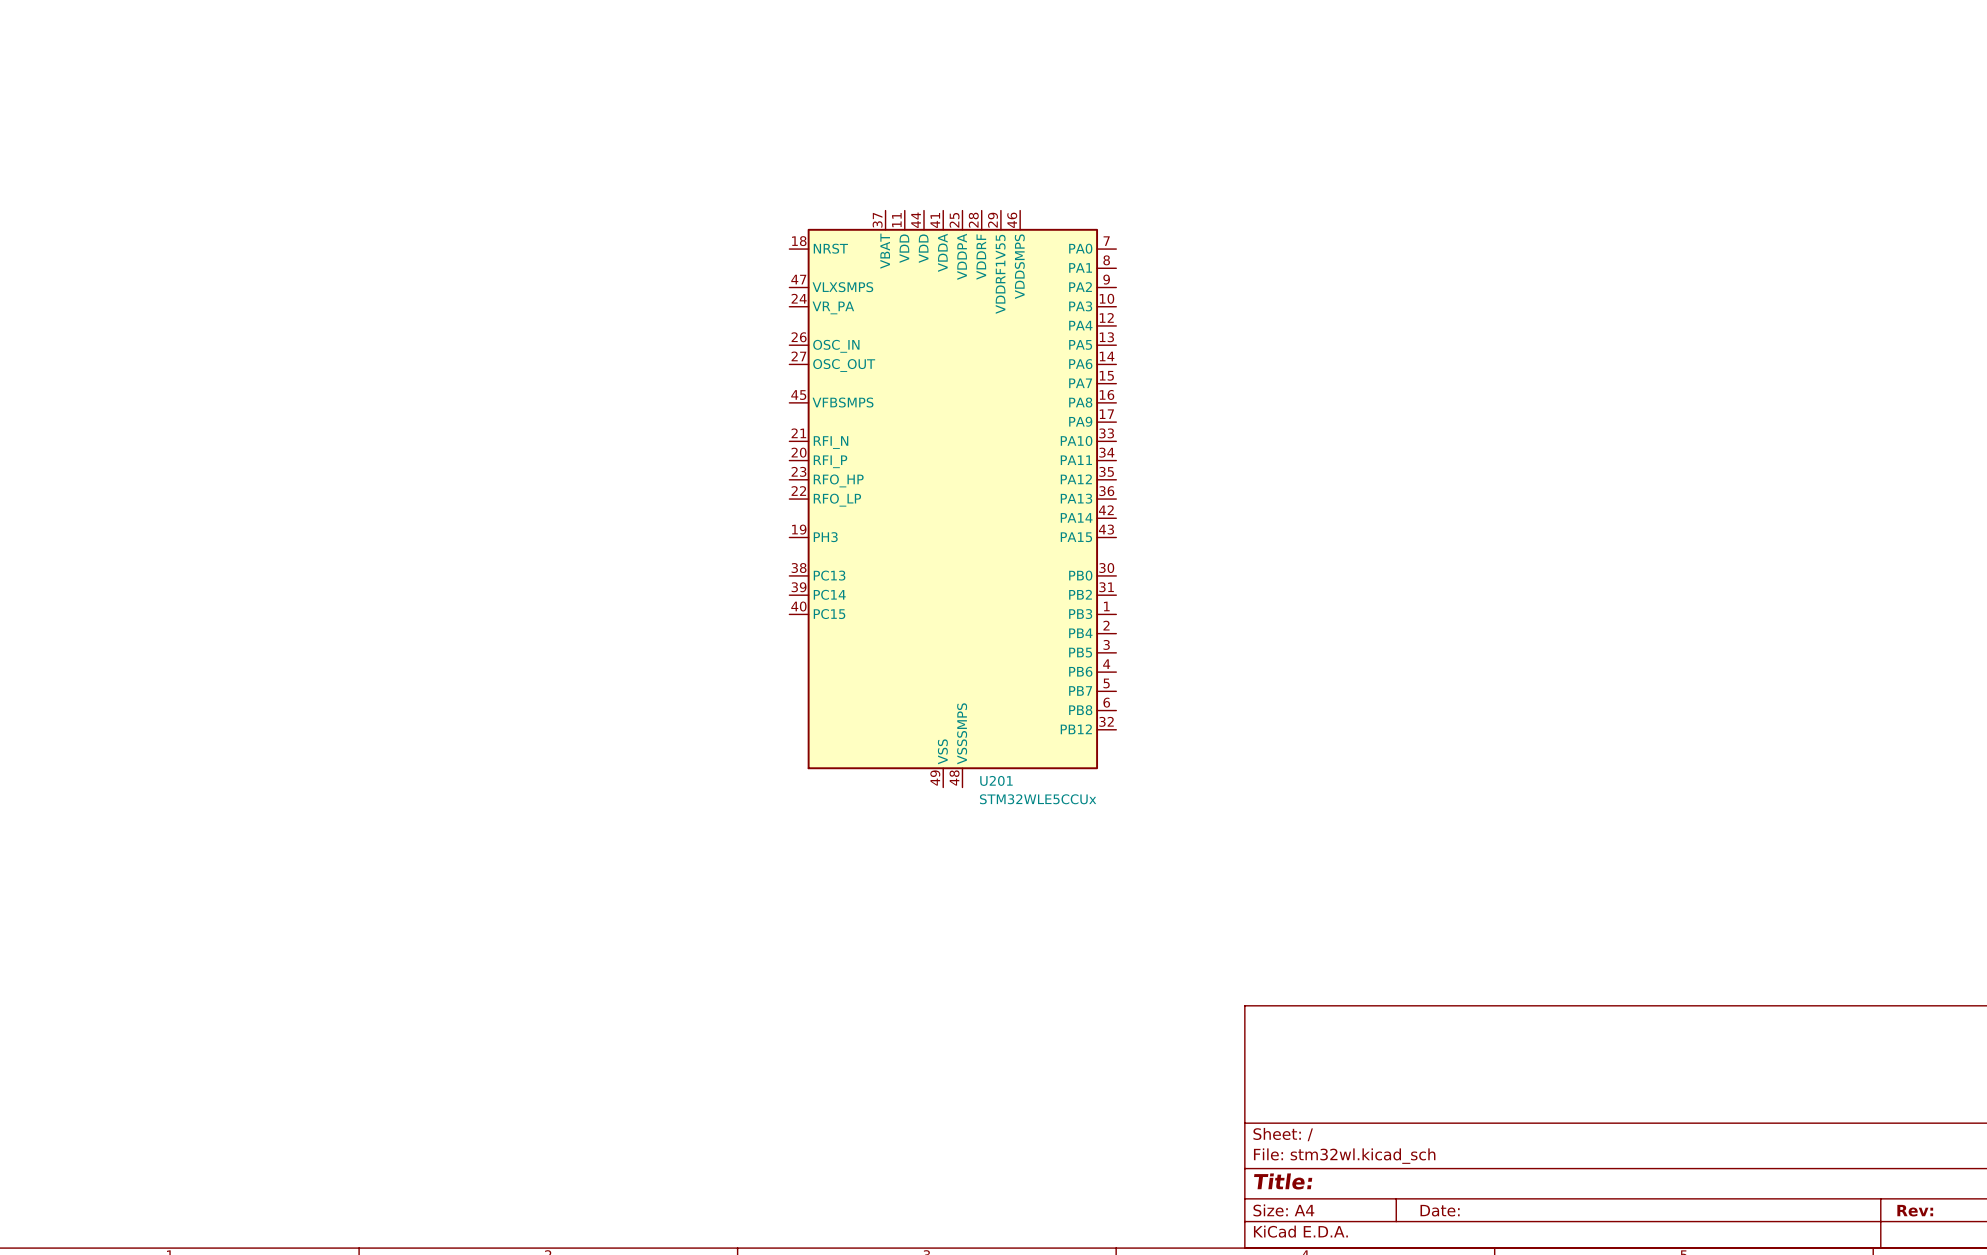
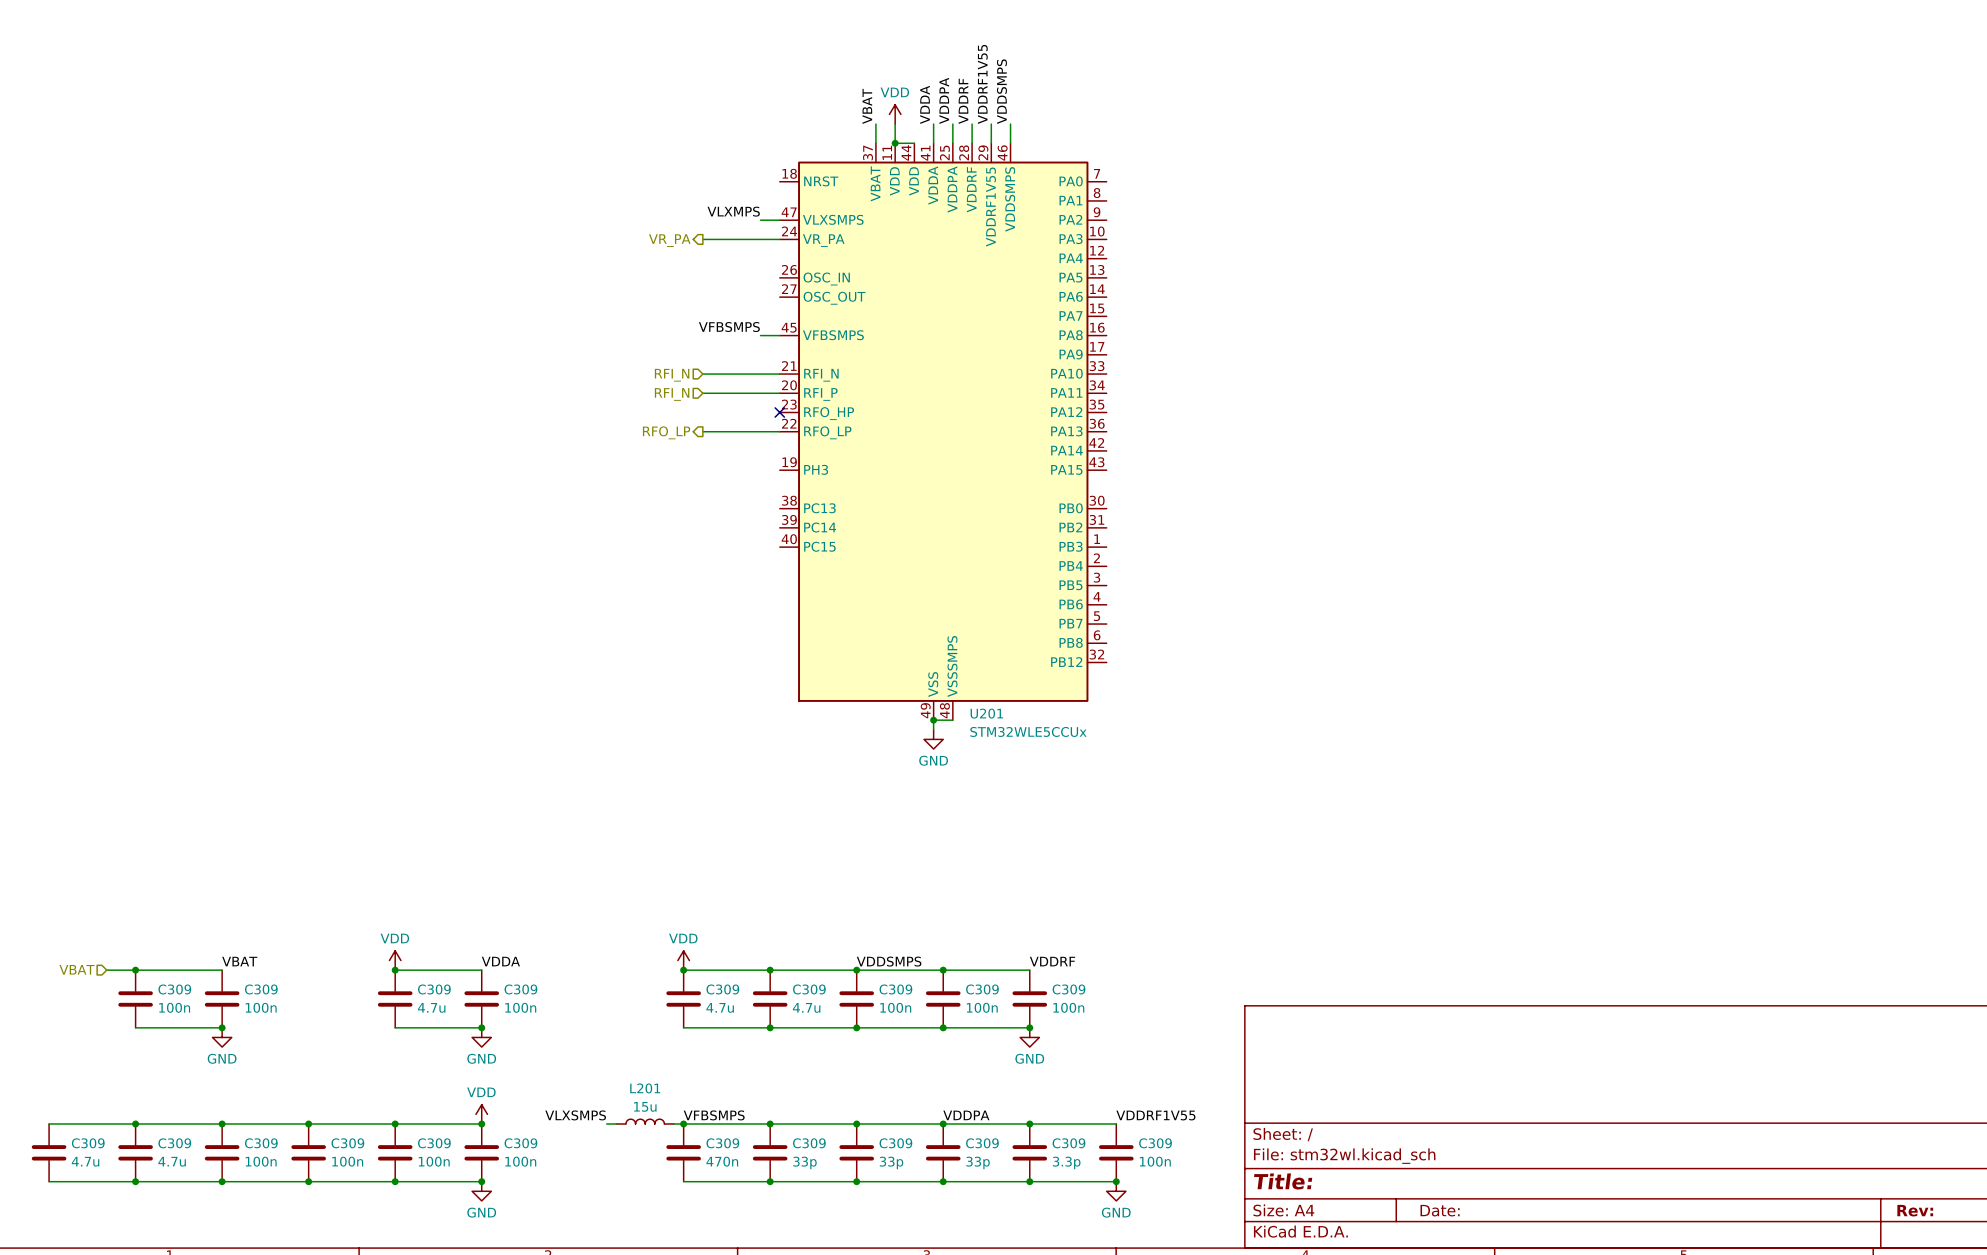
label: none -> VDDRF1V55 (982, 84)
label: none -> VDDSMPS (1001, 91)
label: none -> VDDPA (944, 100)
label: none -> VDDRF (963, 101)
label: none -> VDDA (925, 104)
label: none -> VBAT (867, 106)
power symbol: none -> VDD (895, 114)
wire: none -> (875, 124) (875, 143)
wire: none -> (895, 124) (895, 143) (914, 143)
wire: none -> (933, 124) (933, 143)
wire: none -> (952, 124) (952, 143)
wire: none -> (972, 124) (972, 143)
wire: none -> (991, 124) (991, 143)
wire: none -> (1010, 124) (1010, 143)
junction: none -> (895, 143)
label: none -> VLXMPS (733, 211)
wire: none -> (760, 220) (779, 220)
wire: none -> (702, 239) (779, 239)
hierarchical label: none -> VR_PA (669, 240)
label: none -> VFBSMPS (729, 327)
wire: none -> (760, 335) (779, 335)
wire: none -> (702, 374) (779, 374)
hierarchical label: none -> RFI_N (672, 375)
wire: none -> (702, 393) (779, 393)
hierarchical label: none -> RFI_N (672, 394)
no-connect mark: none -> (779, 412)
wire: none -> (702, 431) (779, 431)
hierarchical label: none -> RFO_LP (666, 432)
U201 position: (952, 499) -> (943, 431)
junction: none -> (933, 720)
power symbol: none -> GND (933, 739)
power symbol: none -> VDD (395, 960)
power symbol: none -> VDD (683, 960)
label: none -> VBAT (239, 961)
label: none -> VDDA (500, 961)
label: none -> VDDSMPS (889, 961)
label: none -> VDDRF (1052, 961)
hierarchical label: none -> VBAT (77, 969)
wire: none -> (106, 970) (222, 970)
junction: none -> (135, 970)
wire: none -> (395, 970) (481, 970)
junction: none -> (395, 970)
wire: none -> (683, 970) (1029, 970)
junction: none -> (683, 970)
junction: none -> (770, 970)
junction: none -> (856, 970)
junction: none -> (943, 970)
C309: none -> 100n (135, 999)
C309: none -> 100n (222, 999)
C309: none -> 4.7u (395, 999)
C309: none -> 100n (481, 999)
C309: none -> 4.7u (683, 999)
C309: none -> 4.7u (770, 999)
C309: none -> 100n (856, 999)
C309: none -> 100n (943, 999)
C309: none -> 100n (1029, 999)
wire: none -> (135, 1027) (222, 1027)
junction: none -> (222, 1027)
wire: none -> (395, 1027) (481, 1027)
junction: none -> (481, 1027)
wire: none -> (683, 1027) (1029, 1027)
junction: none -> (770, 1027)
junction: none -> (856, 1027)
junction: none -> (943, 1027)
junction: none -> (1029, 1027)
power symbol: none -> GND (222, 1037)
power symbol: none -> GND (481, 1037)
power symbol: none -> GND (1029, 1037)
power symbol: none -> VDD (481, 1114)
label: none -> VLXSMPS (575, 1115)
label: none -> VFBSMPS (714, 1115)
label: none -> VDDPA (966, 1115)
label: none -> VDDRF1V55 (1155, 1115)
L201: none -> 15u (645, 1121)
wire: none -> (49, 1123) (481, 1123)
junction: none -> (135, 1123)
junction: none -> (222, 1123)
junction: none -> (308, 1123)
junction: none -> (395, 1123)
junction: none -> (481, 1123)
wire: none -> (606, 1123) (616, 1123)
wire: none -> (674, 1123) (1116, 1123)
junction: none -> (683, 1123)
junction: none -> (770, 1123)
junction: none -> (856, 1123)
junction: none -> (943, 1123)
junction: none -> (1029, 1123)
C309: none -> 4.7u (49, 1152)
C309: none -> 4.7u (135, 1152)
C309: none -> 100n (222, 1152)
C309: none -> 100n (308, 1152)
C309: none -> 100n (395, 1152)
C309: none -> 100n (481, 1152)
C309: none -> 470n (683, 1152)
C309: none -> 33p (770, 1152)
C309: none -> 33p (856, 1152)
C309: none -> 33p (943, 1152)
C309: none -> 3.3p (1029, 1152)
C309: none -> 100n (1116, 1152)
wire: none -> (49, 1181) (481, 1181)
junction: none -> (135, 1181)
junction: none -> (222, 1181)
junction: none -> (308, 1181)
junction: none -> (395, 1181)
junction: none -> (481, 1181)
wire: none -> (683, 1181) (1116, 1181)
junction: none -> (770, 1181)
junction: none -> (856, 1181)
junction: none -> (943, 1181)
junction: none -> (1029, 1181)
junction: none -> (1116, 1181)
power symbol: none -> GND (481, 1191)
power symbol: none -> GND (1116, 1191)

